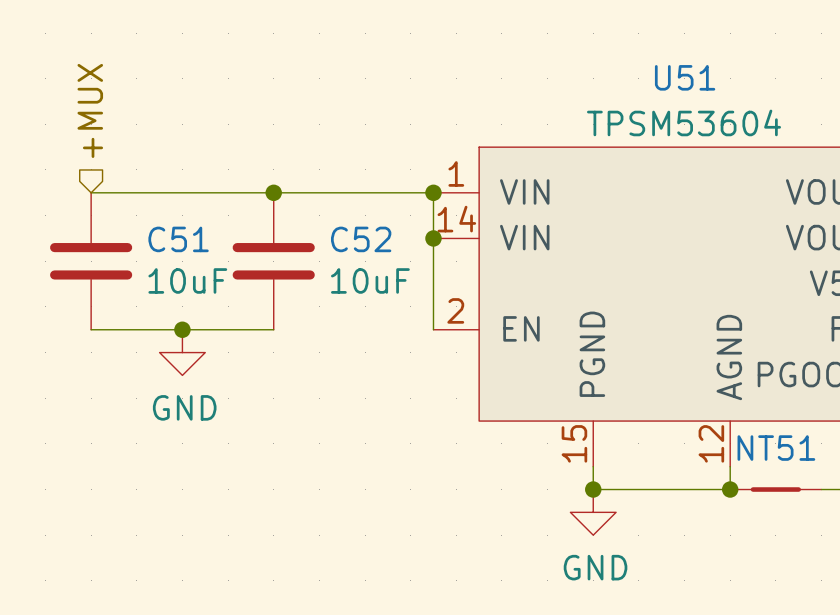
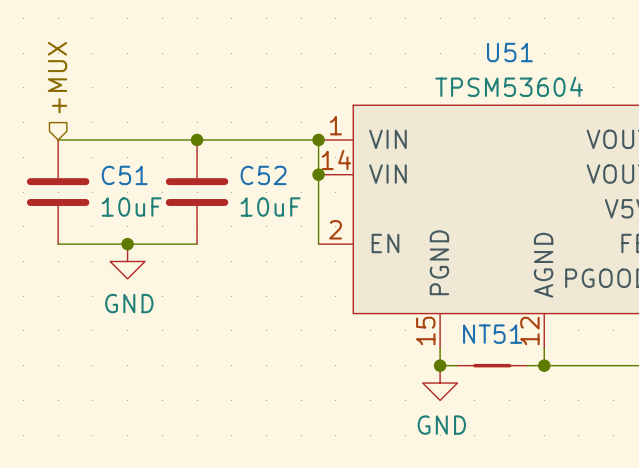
NT51 position: (775, 489) -> (492, 365)

